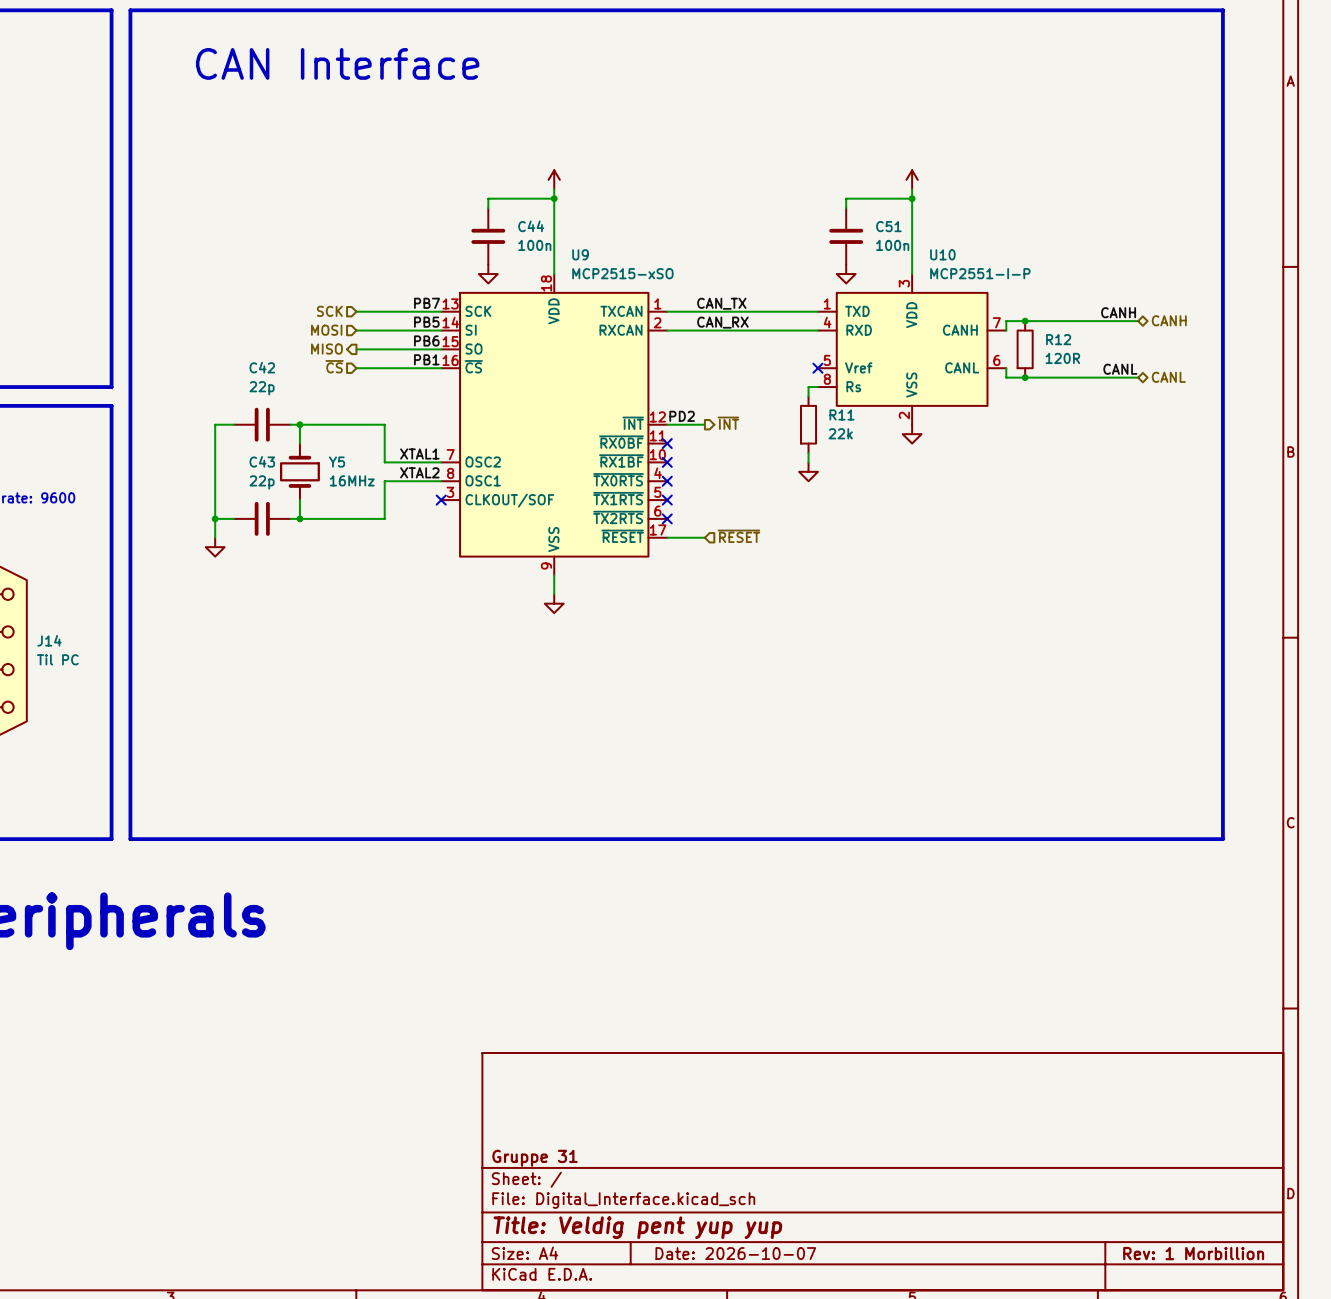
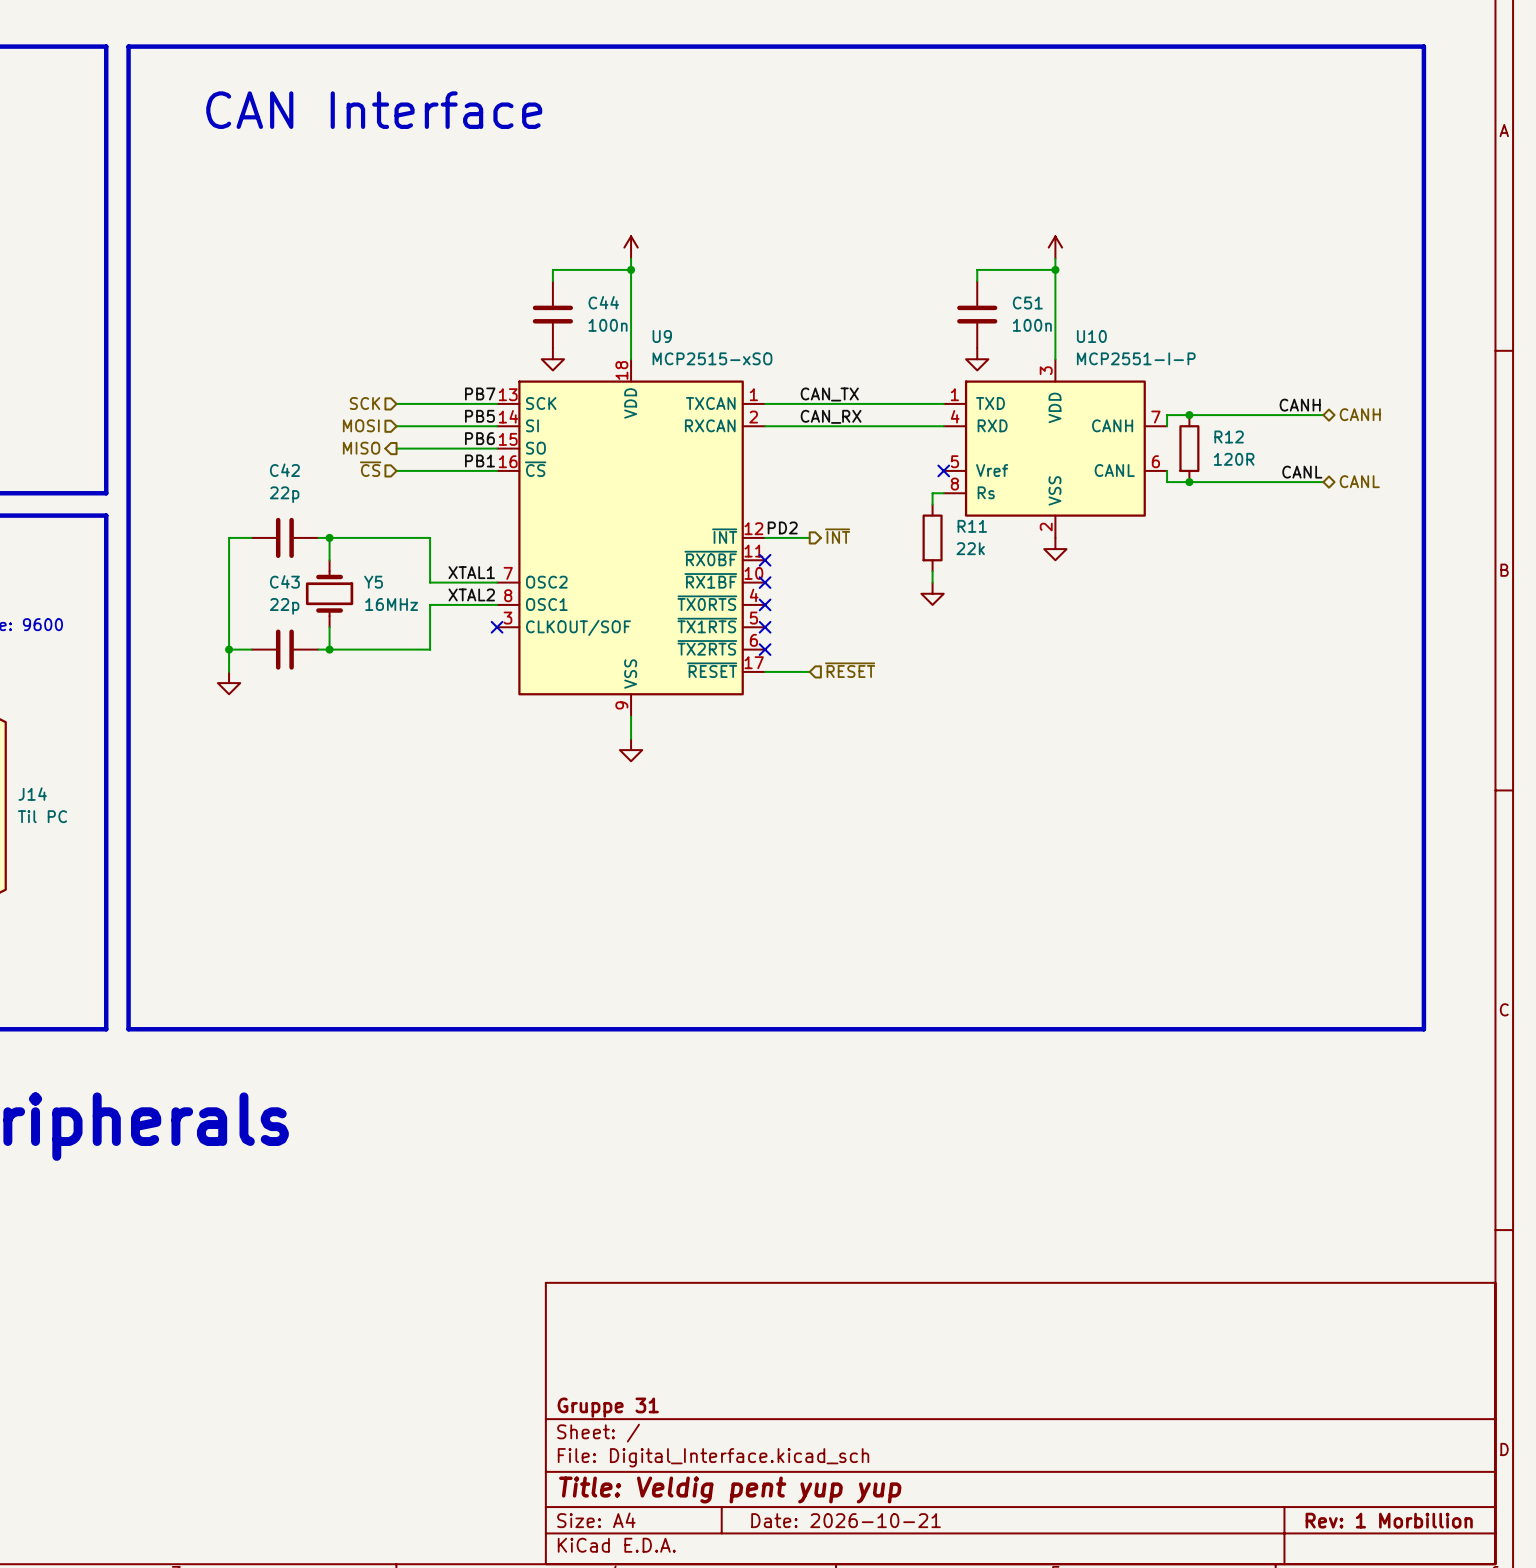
title block: Date: 2026-10-07 (735, 1253) -> Date: 2026-10-21 (846, 1520)

